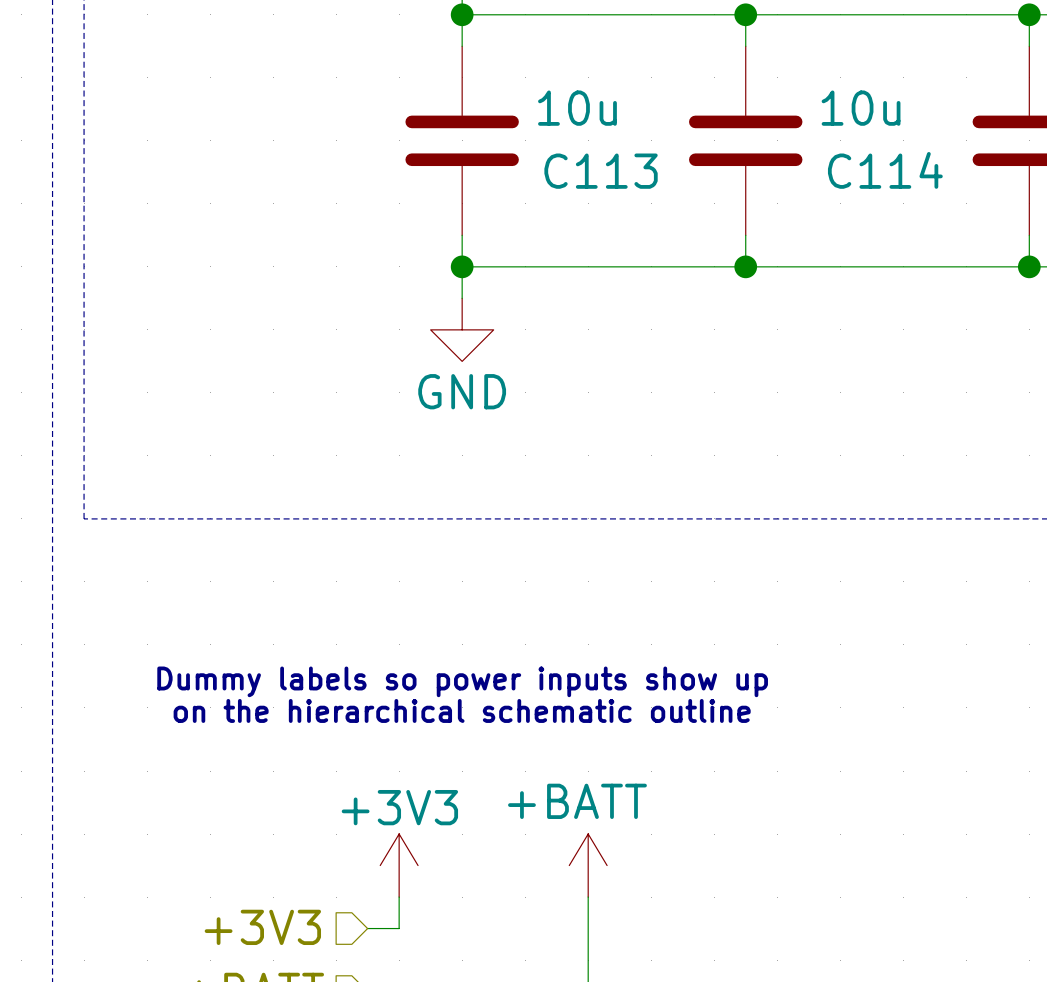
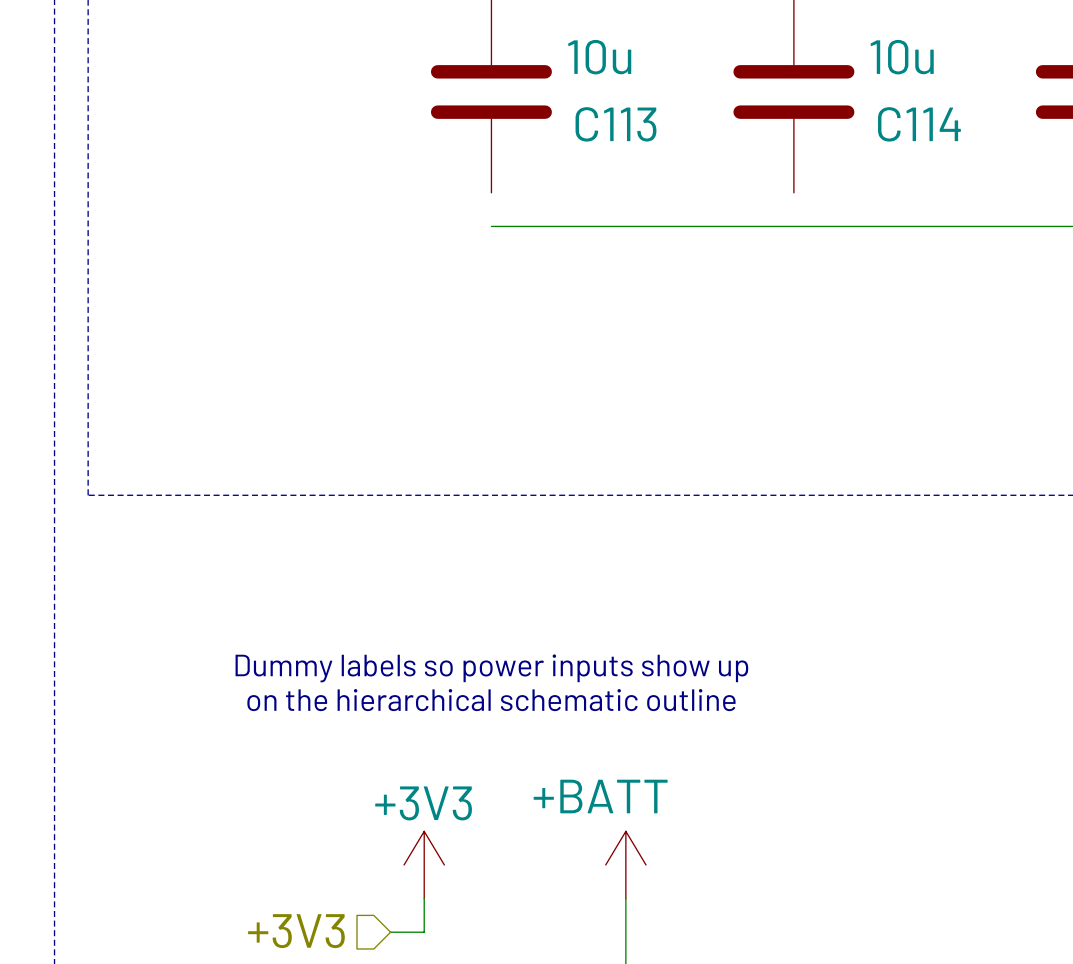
wire: (462, 235) (462, 298) -> none
wire: (745, 235) (745, 266) -> none
junction: (462, 266) -> none
junction: (745, 266) -> none
power symbol: GND (462, 329) -> none

